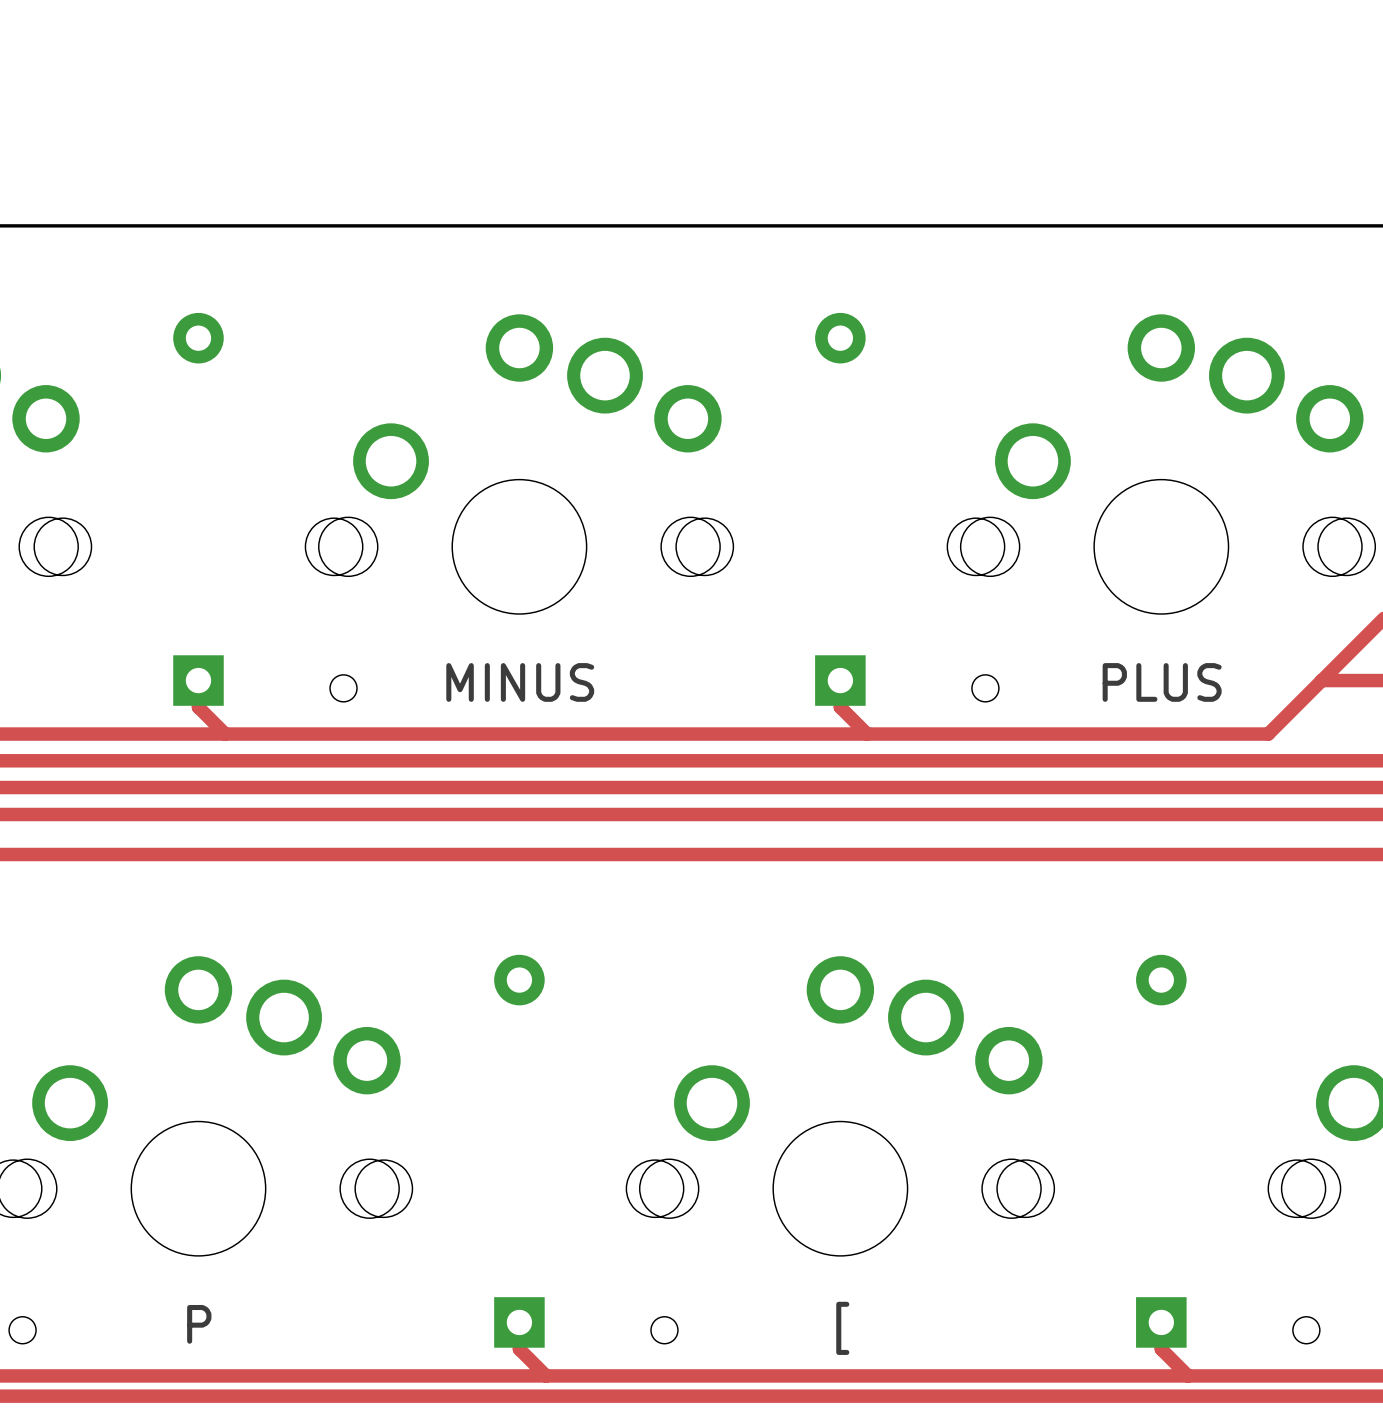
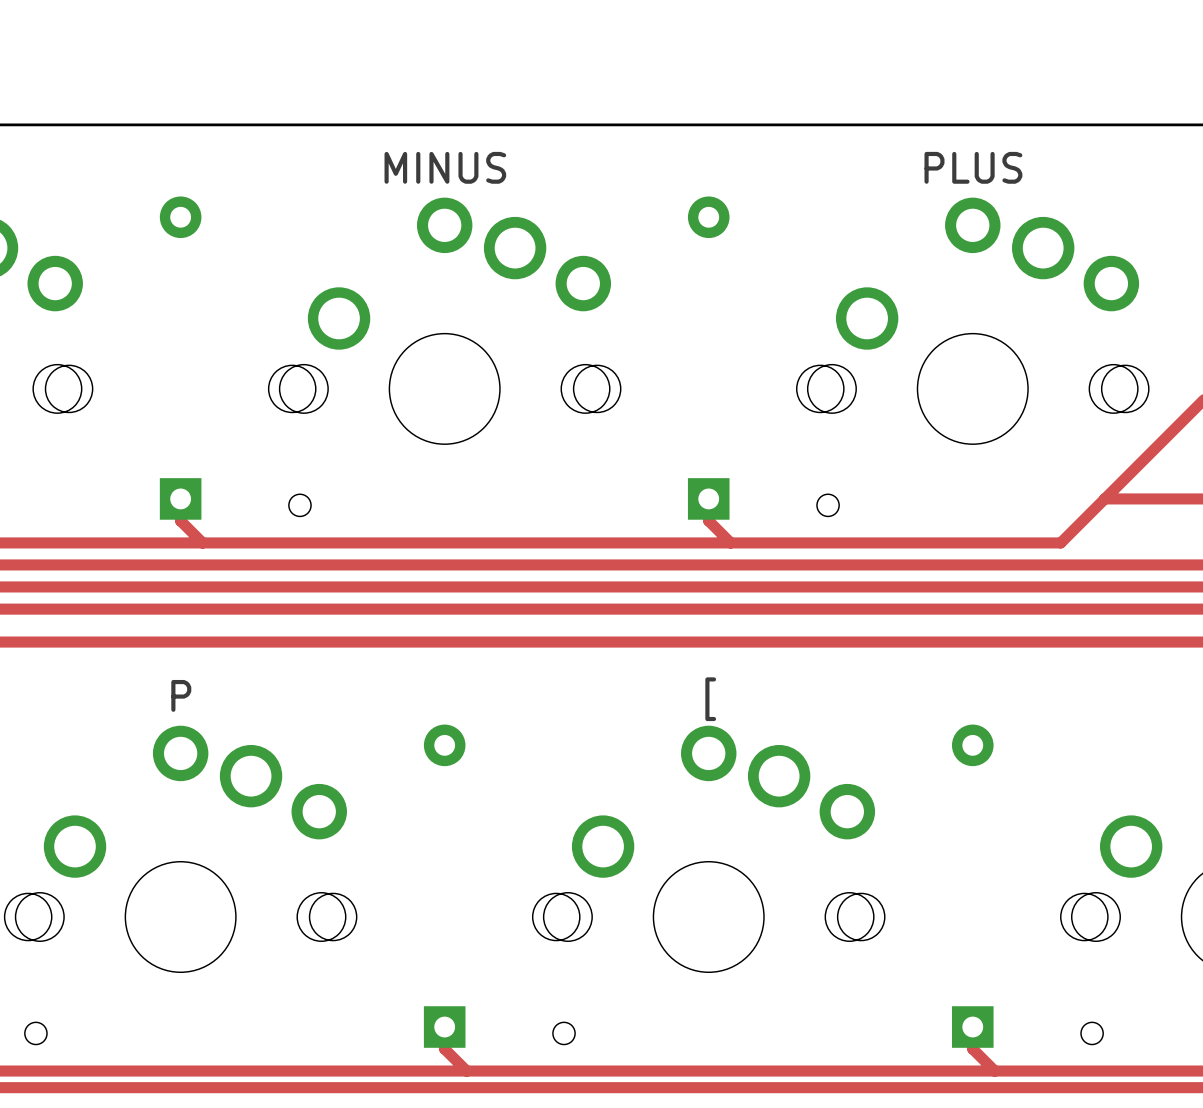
part value position: MINUS (520, 682) -> MINUS (445, 167)
part value position: PLUS (1162, 682) -> PLUS (973, 167)
part value position: P (199, 1324) -> P (181, 695)
part value position: [ (842, 1328) -> [ (710, 699)

